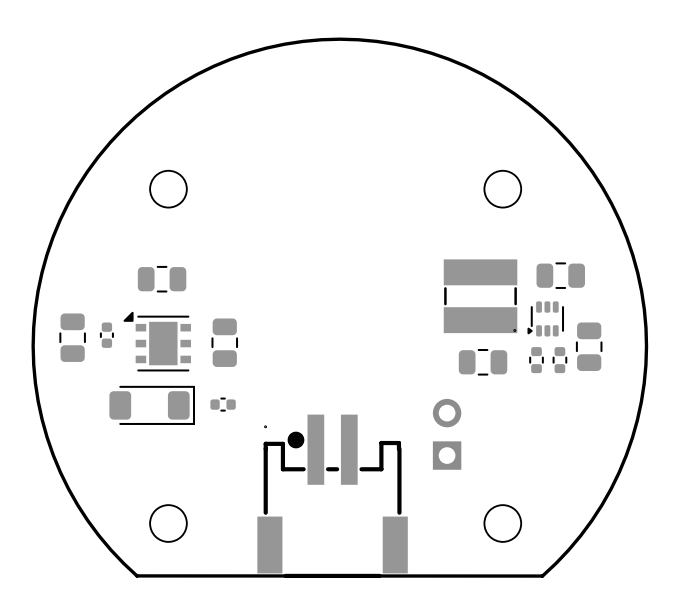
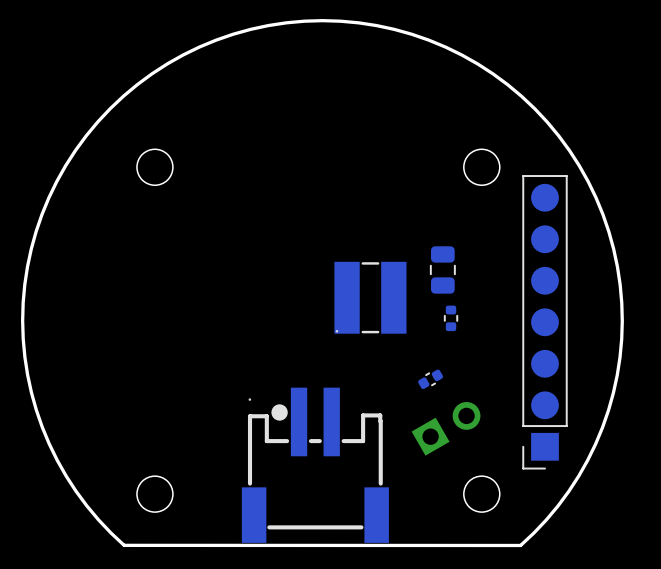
part: (560, 275) -> none
part: (162, 279) -> none
part: none -> (442, 269)
part rotation: 0° (480, 296) -> 90° clockwise (370, 297)
part position: (480, 296) -> (370, 297)
part: (545, 318) -> none
part: (106, 335) -> none
part: (72, 337) -> none
part: (157, 341) -> none
part: (224, 342) -> none
part: none -> (451, 318)
part: (589, 346) -> none
part: none -> (544, 322)
part: (536, 360) -> none
part: (559, 360) -> none
part: (483, 362) -> none
part: (223, 404) -> none
part: (152, 405) -> none
part: none -> (430, 379)
part footprint: [257, 414, 408, 579] -> [241, 387, 389, 543]
part: (447, 434) -> none
part: none -> (446, 428)

